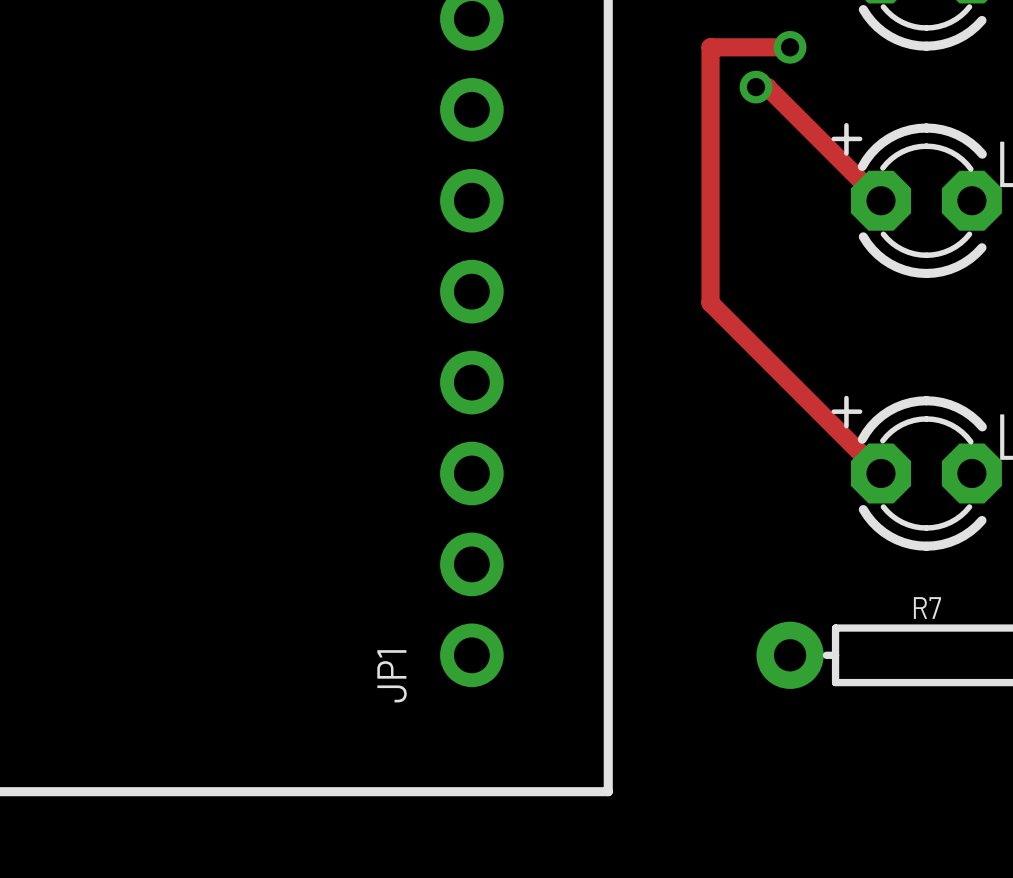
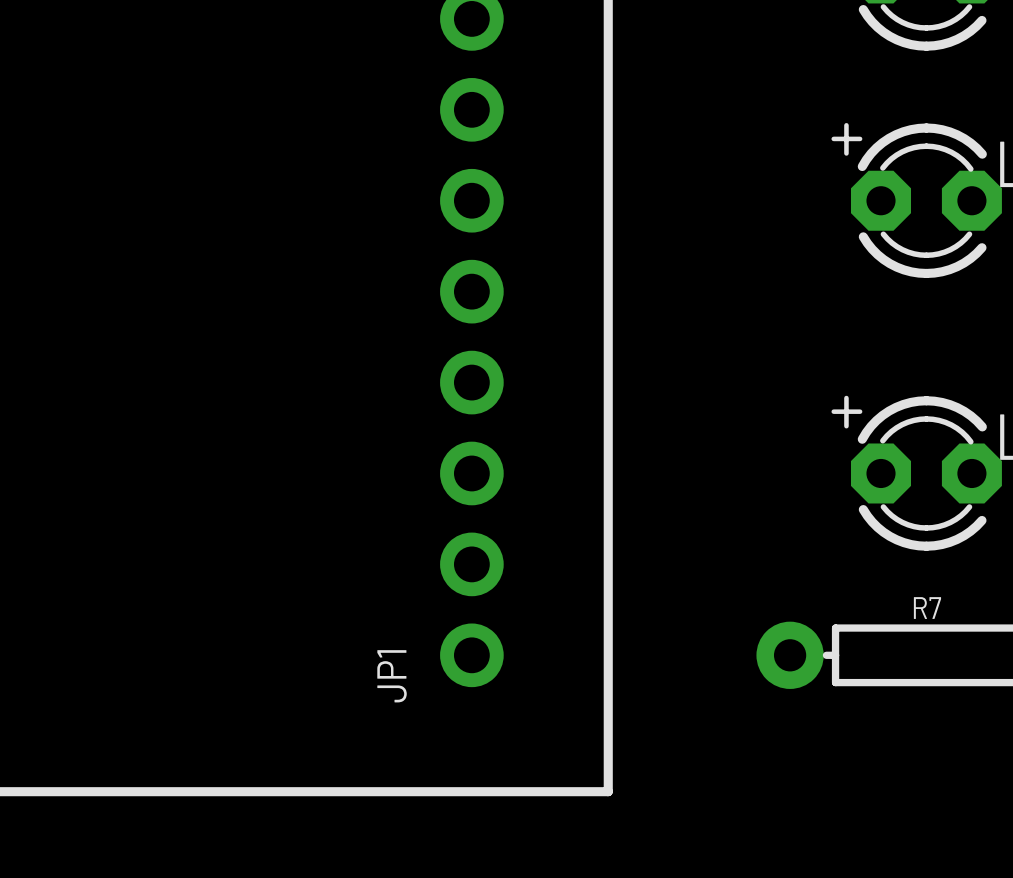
track: (790, 47) (710, 47) (710, 303) (881, 473) -> none
via: (790, 47) -> none
track: (755, 87) (767, 87) (881, 200) -> none
via: (755, 87) -> none

